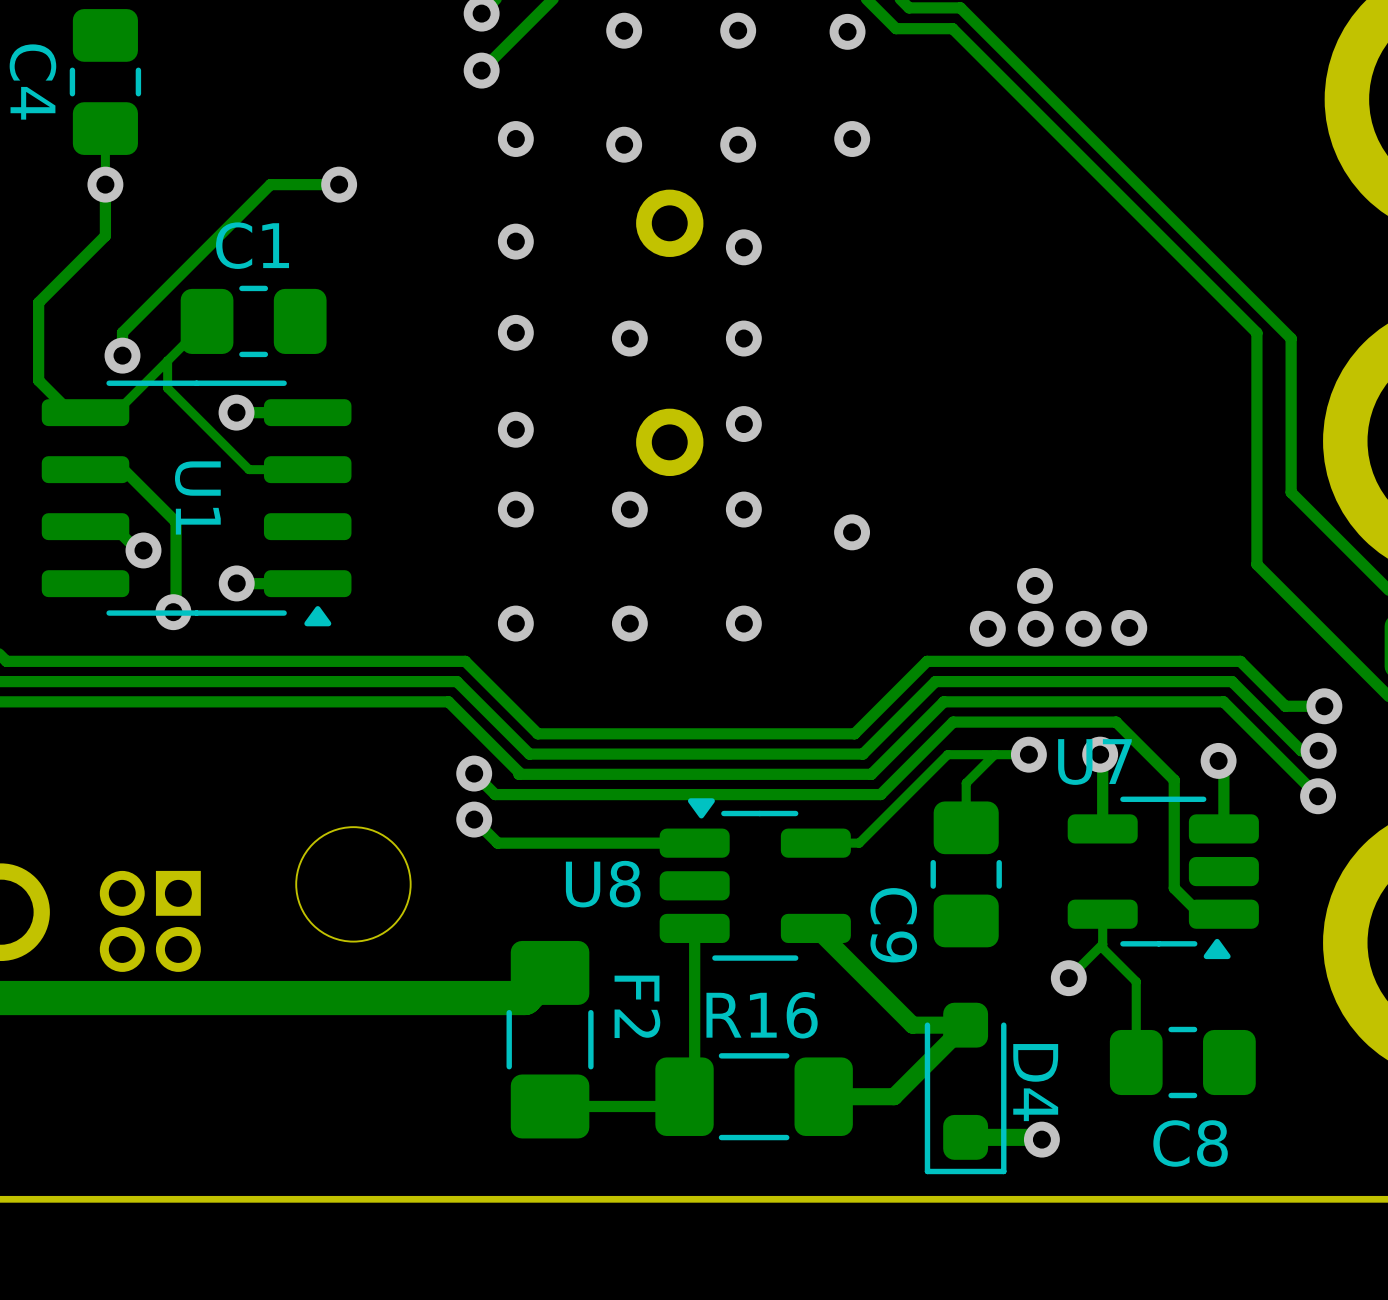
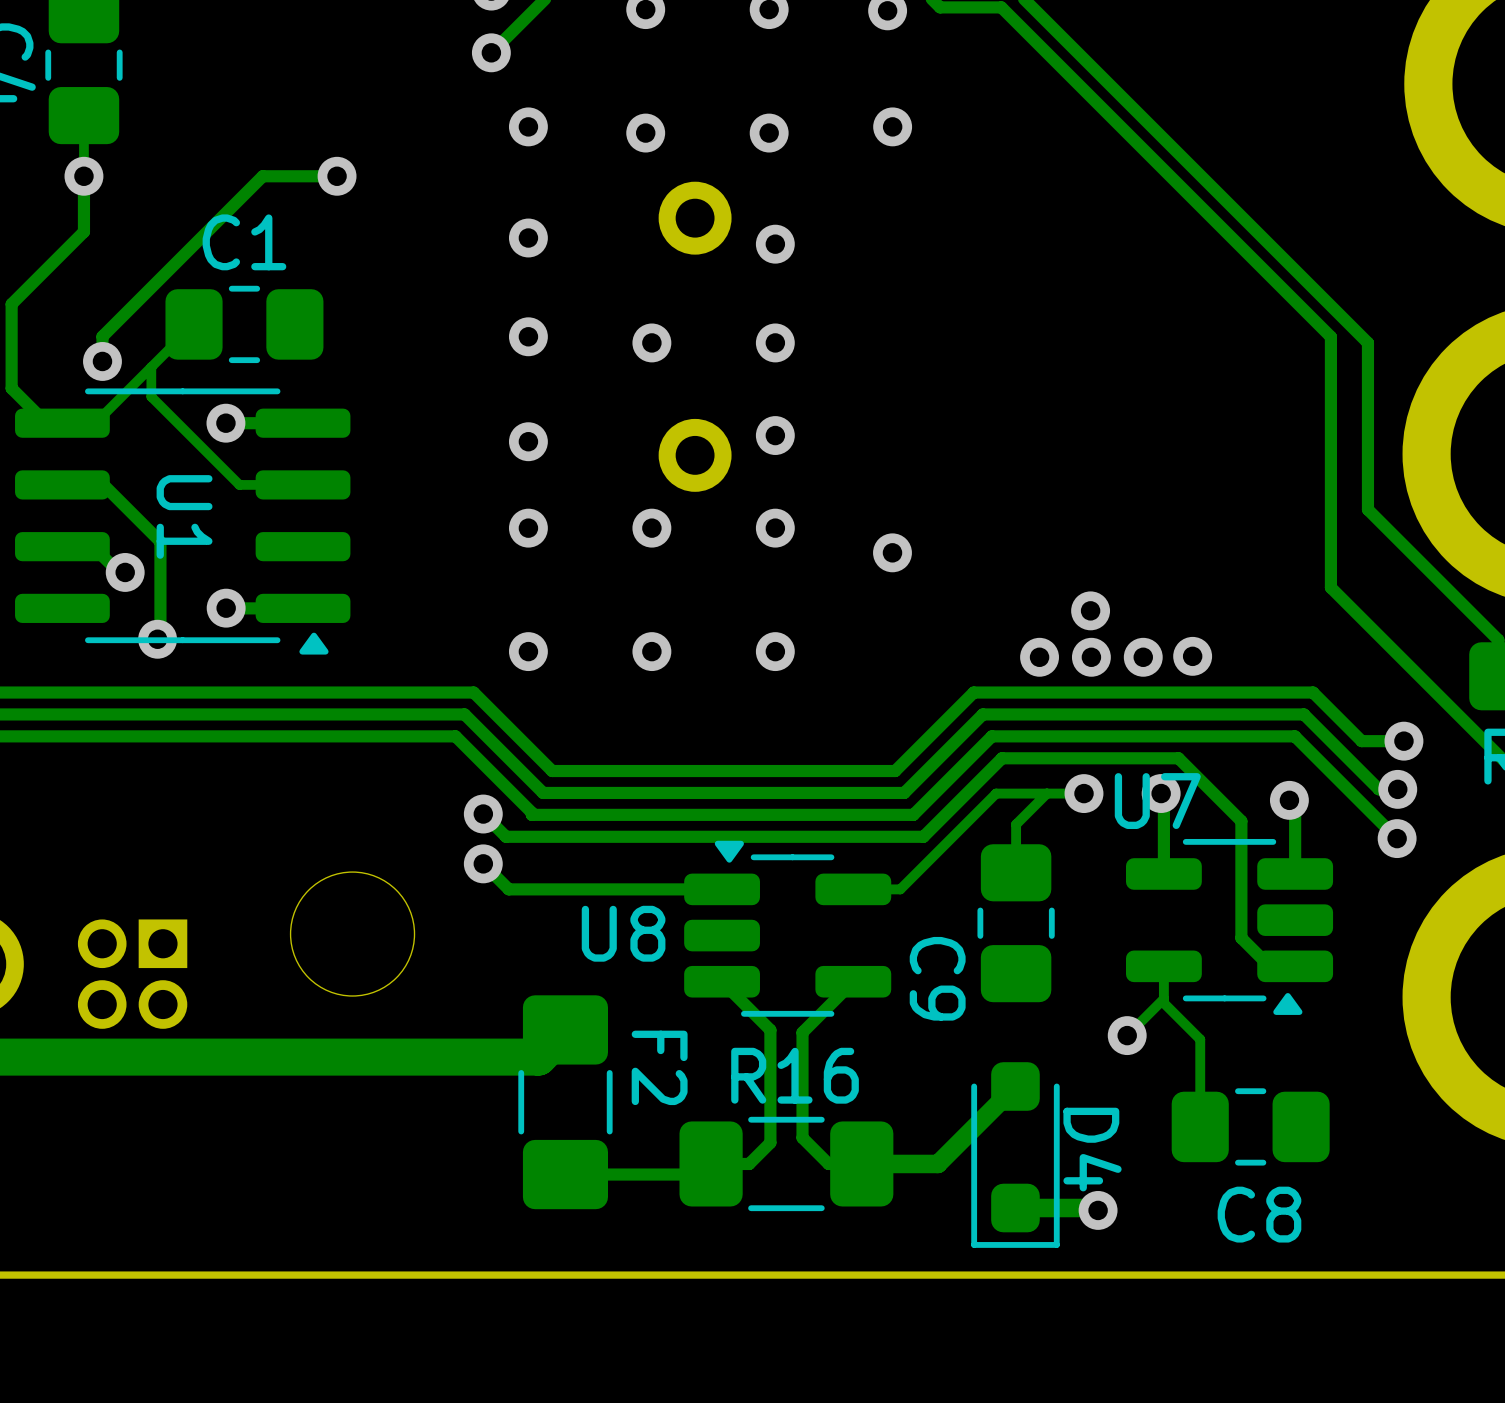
track: (694, 928) (694, 1086) -> (722, 981) (770, 1030) (770, 1142) (749, 1163) (711, 1163) (700, 1174) (690, 1174)
track: (815, 928) (912, 1025) (965, 1025) -> (853, 981) (802, 1032) (802, 1137) (828, 1163) (861, 1163)

